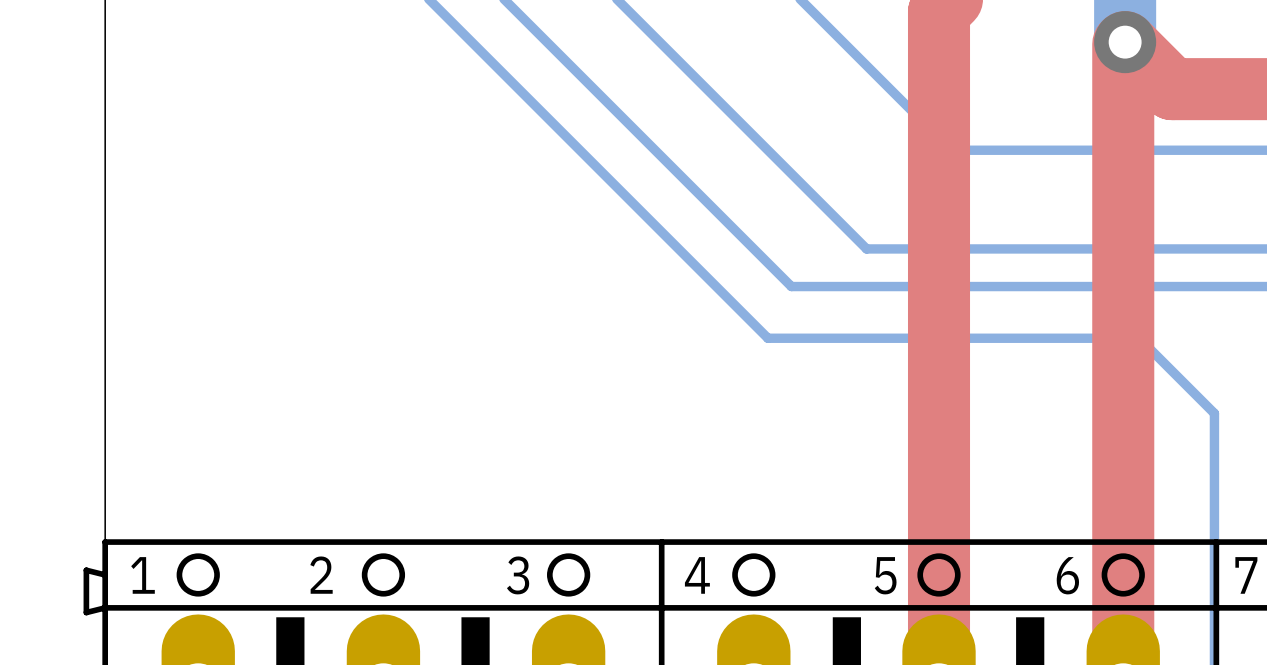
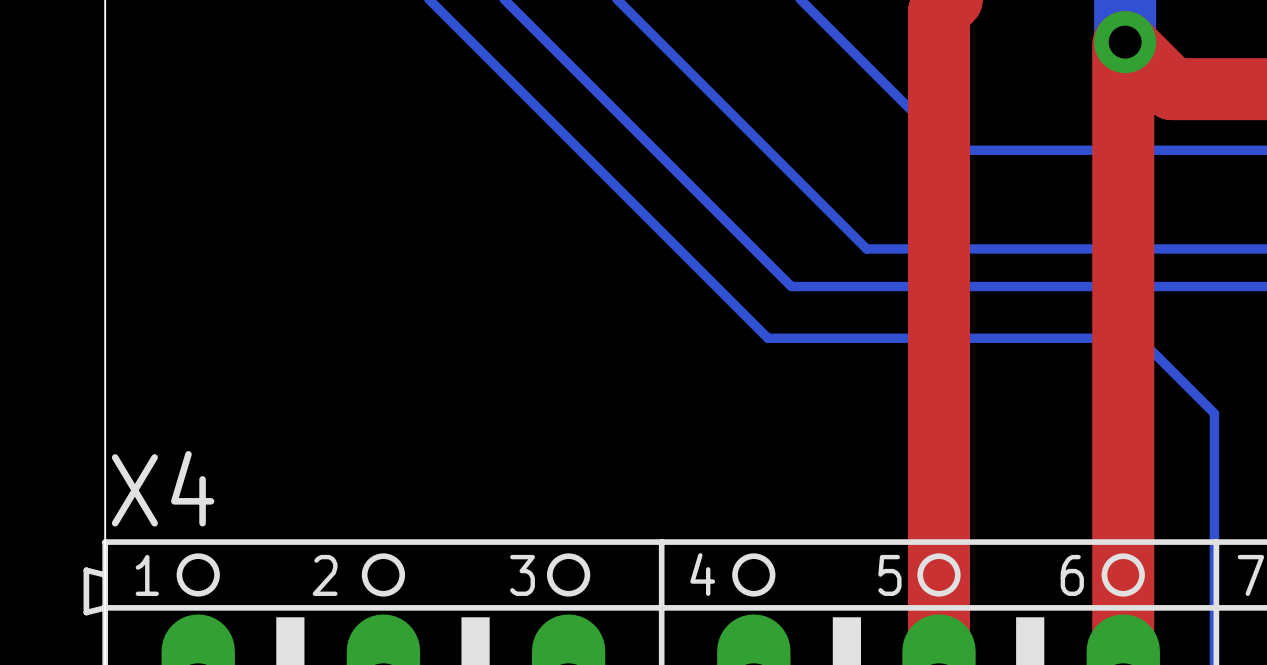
X4 name: none -> X4 (163, 488)

